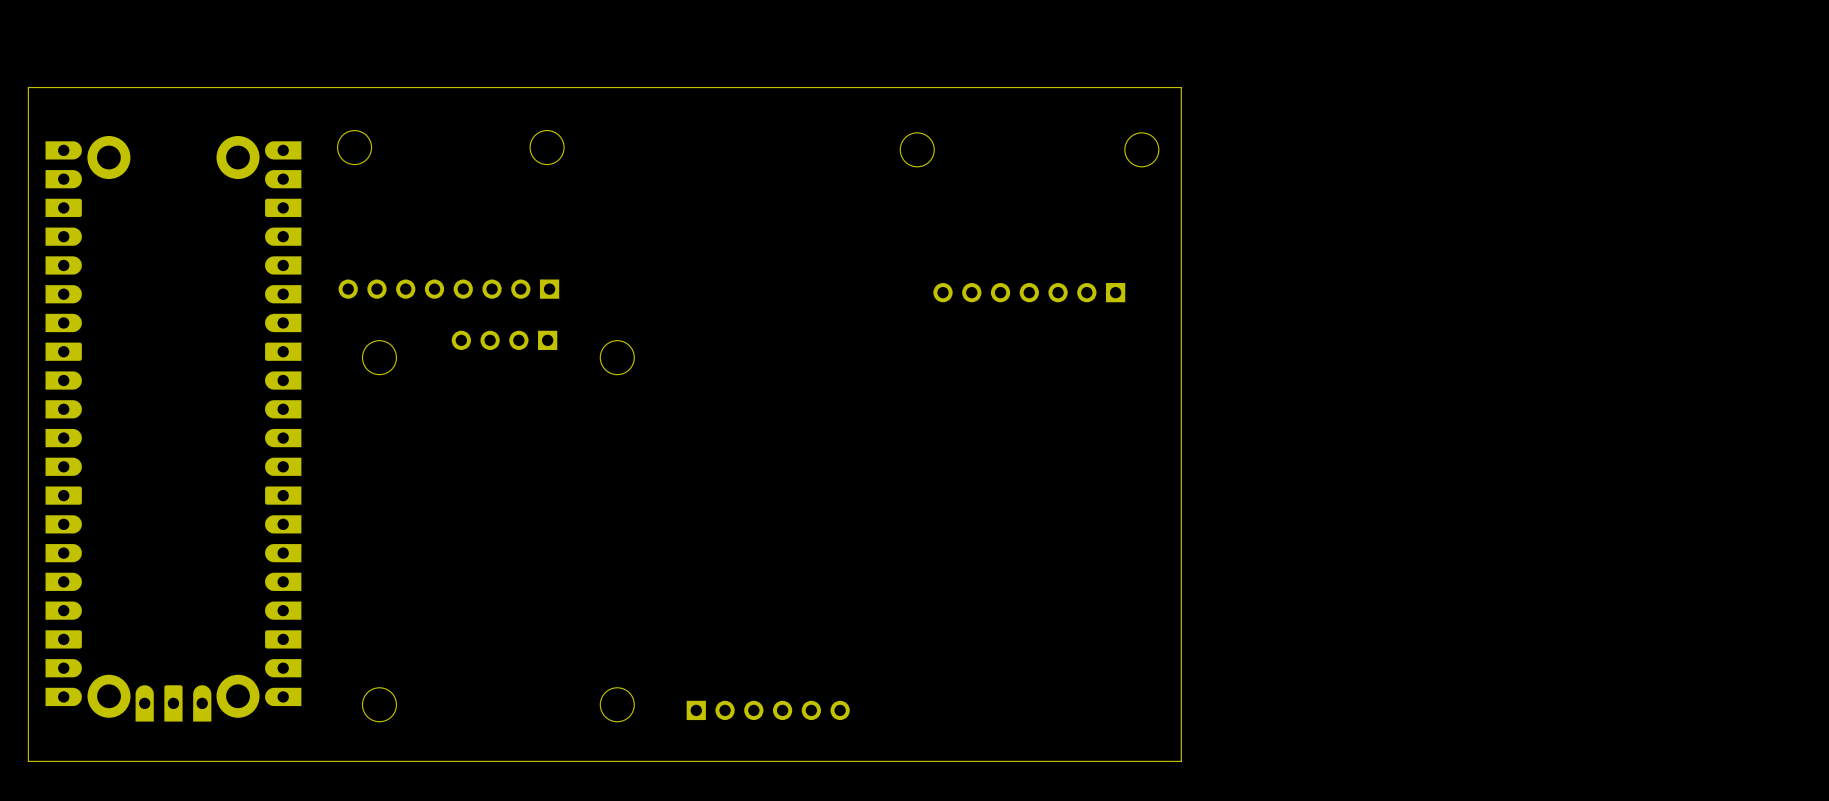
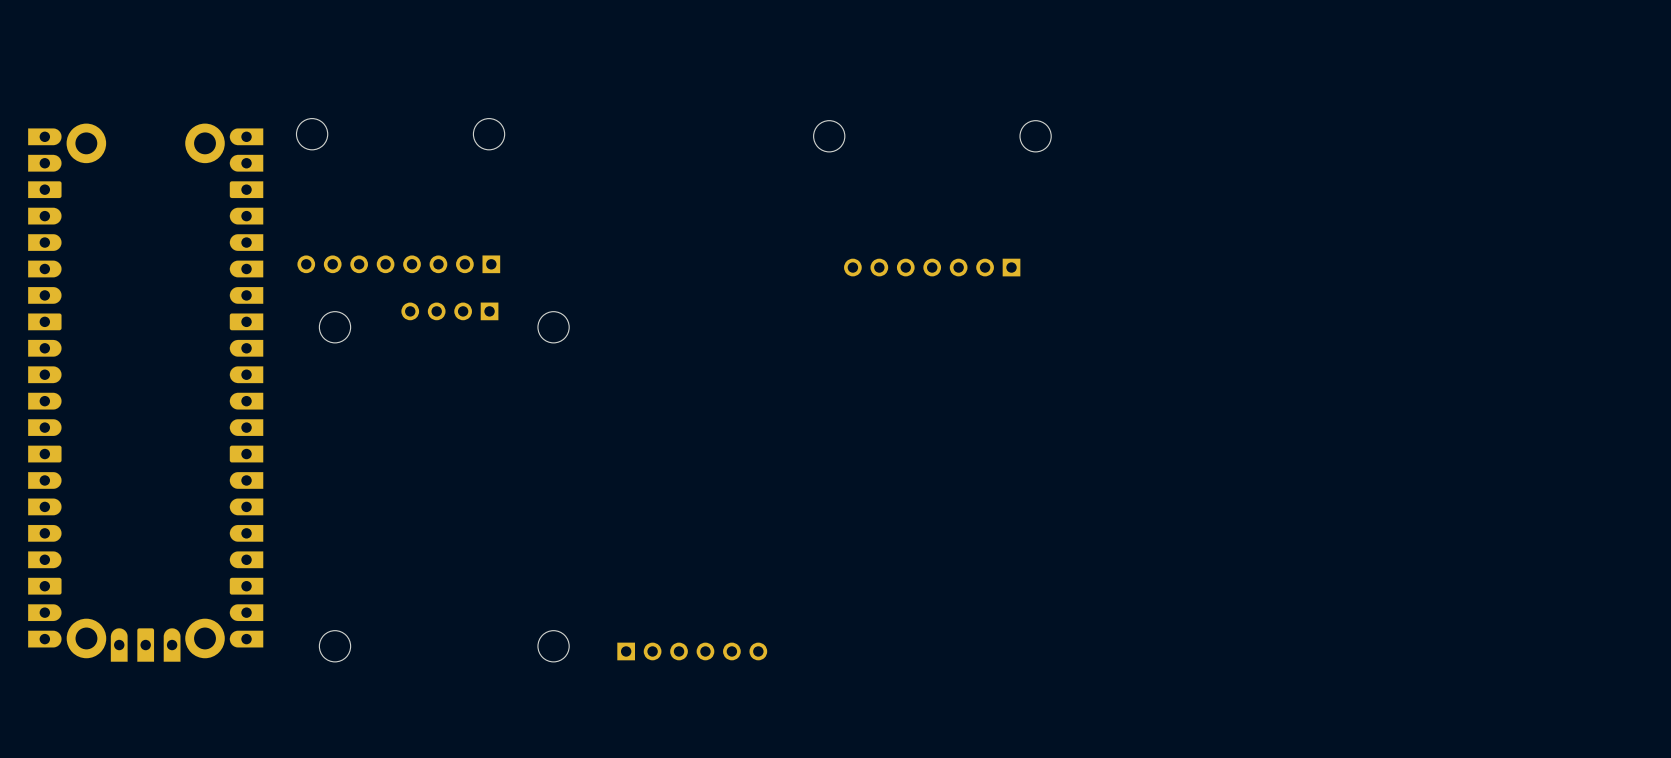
board edge: (1181, 87) (28, 87) (28, 761) (1181, 761) (1181, 87) -> none

